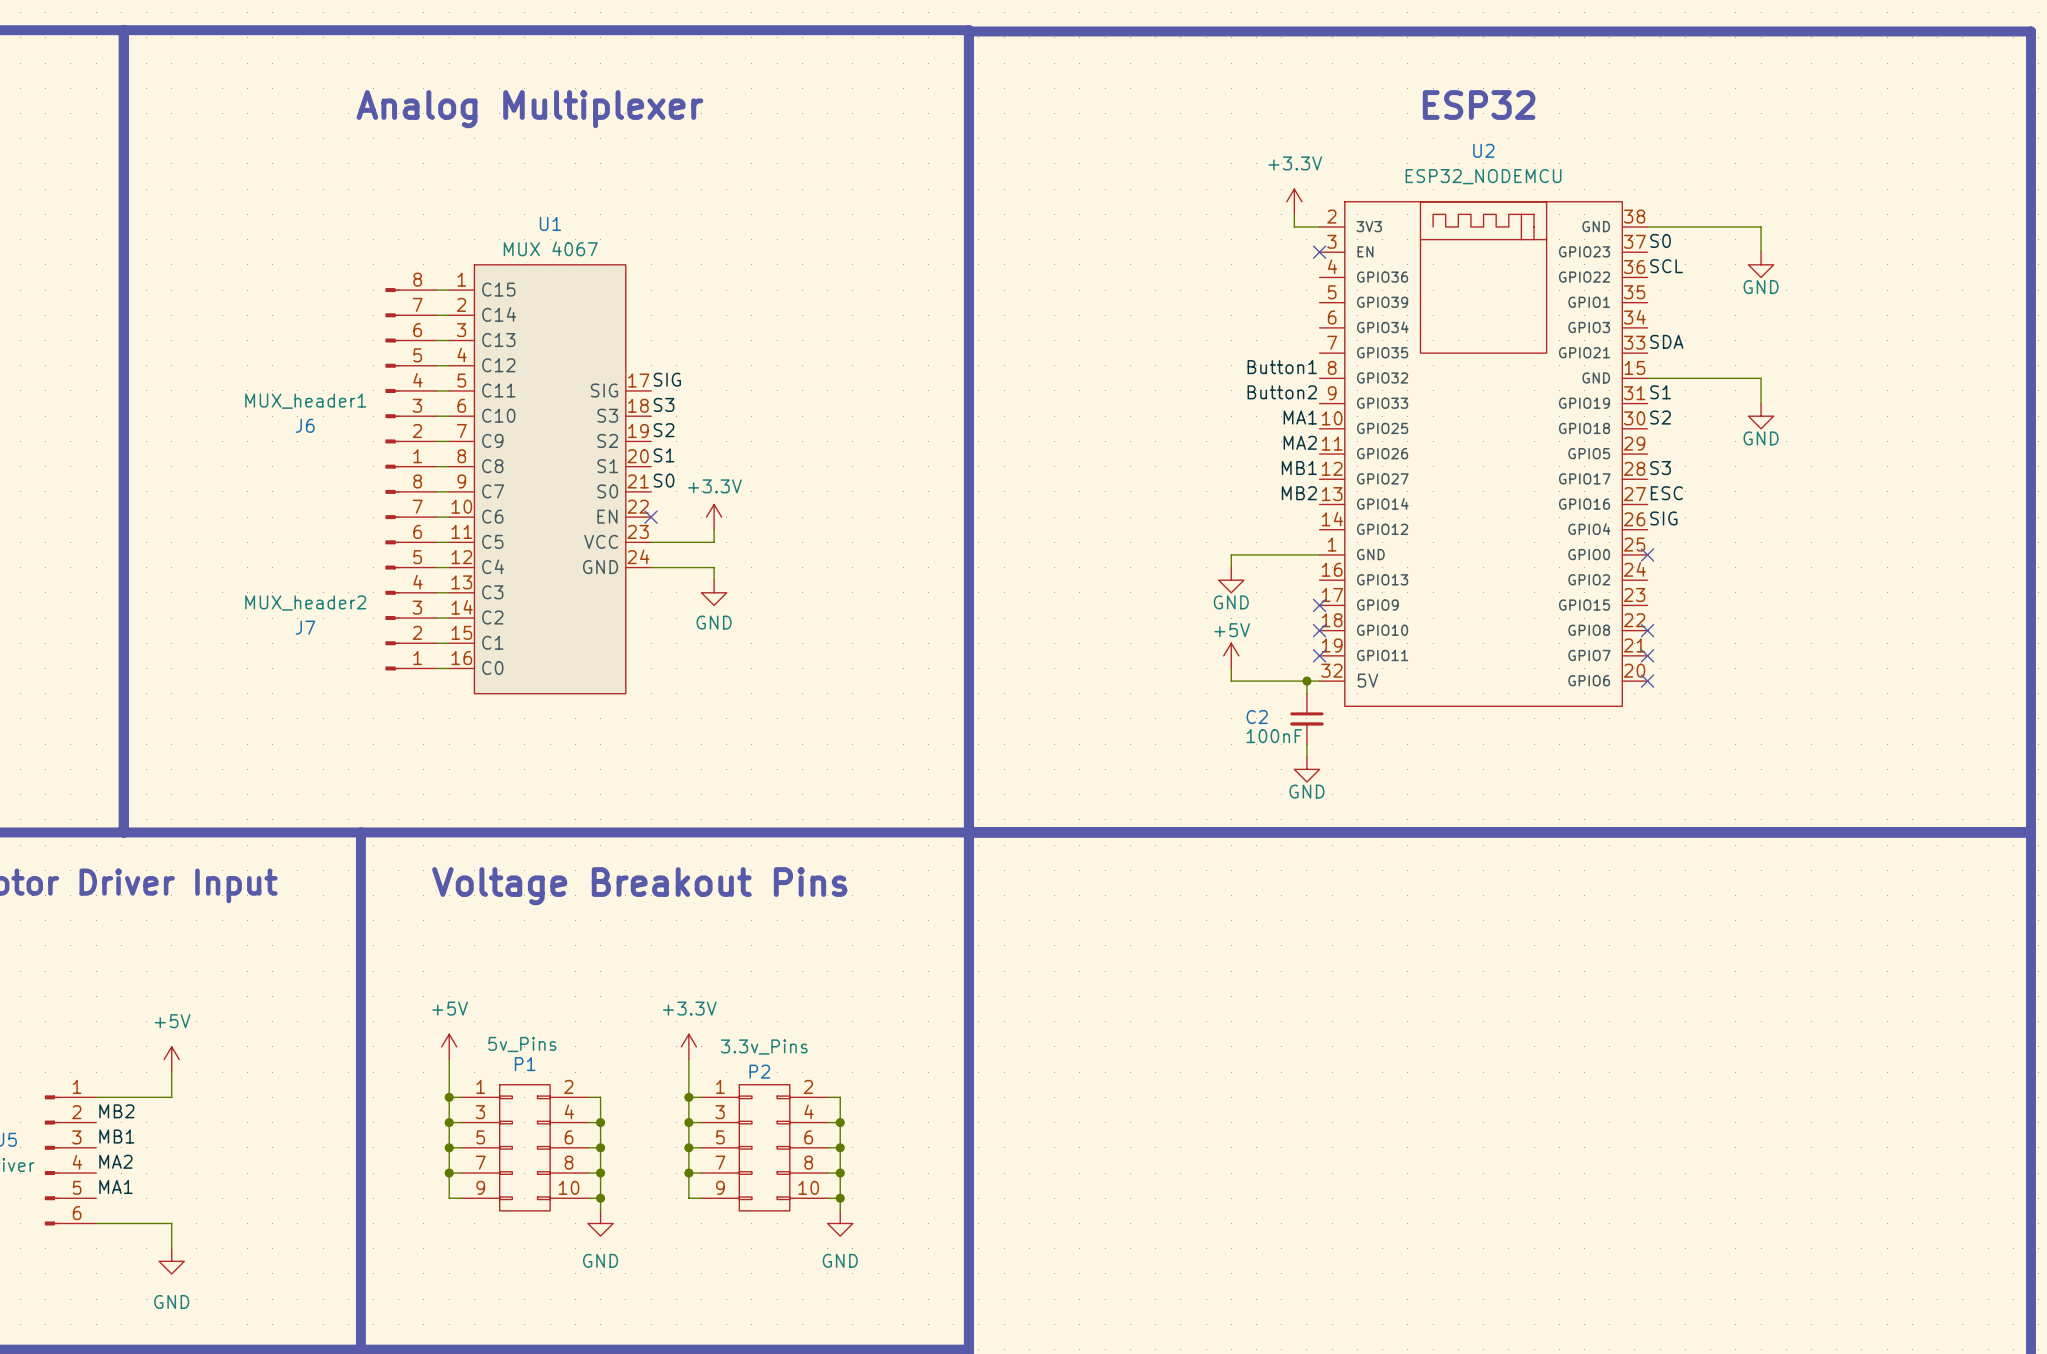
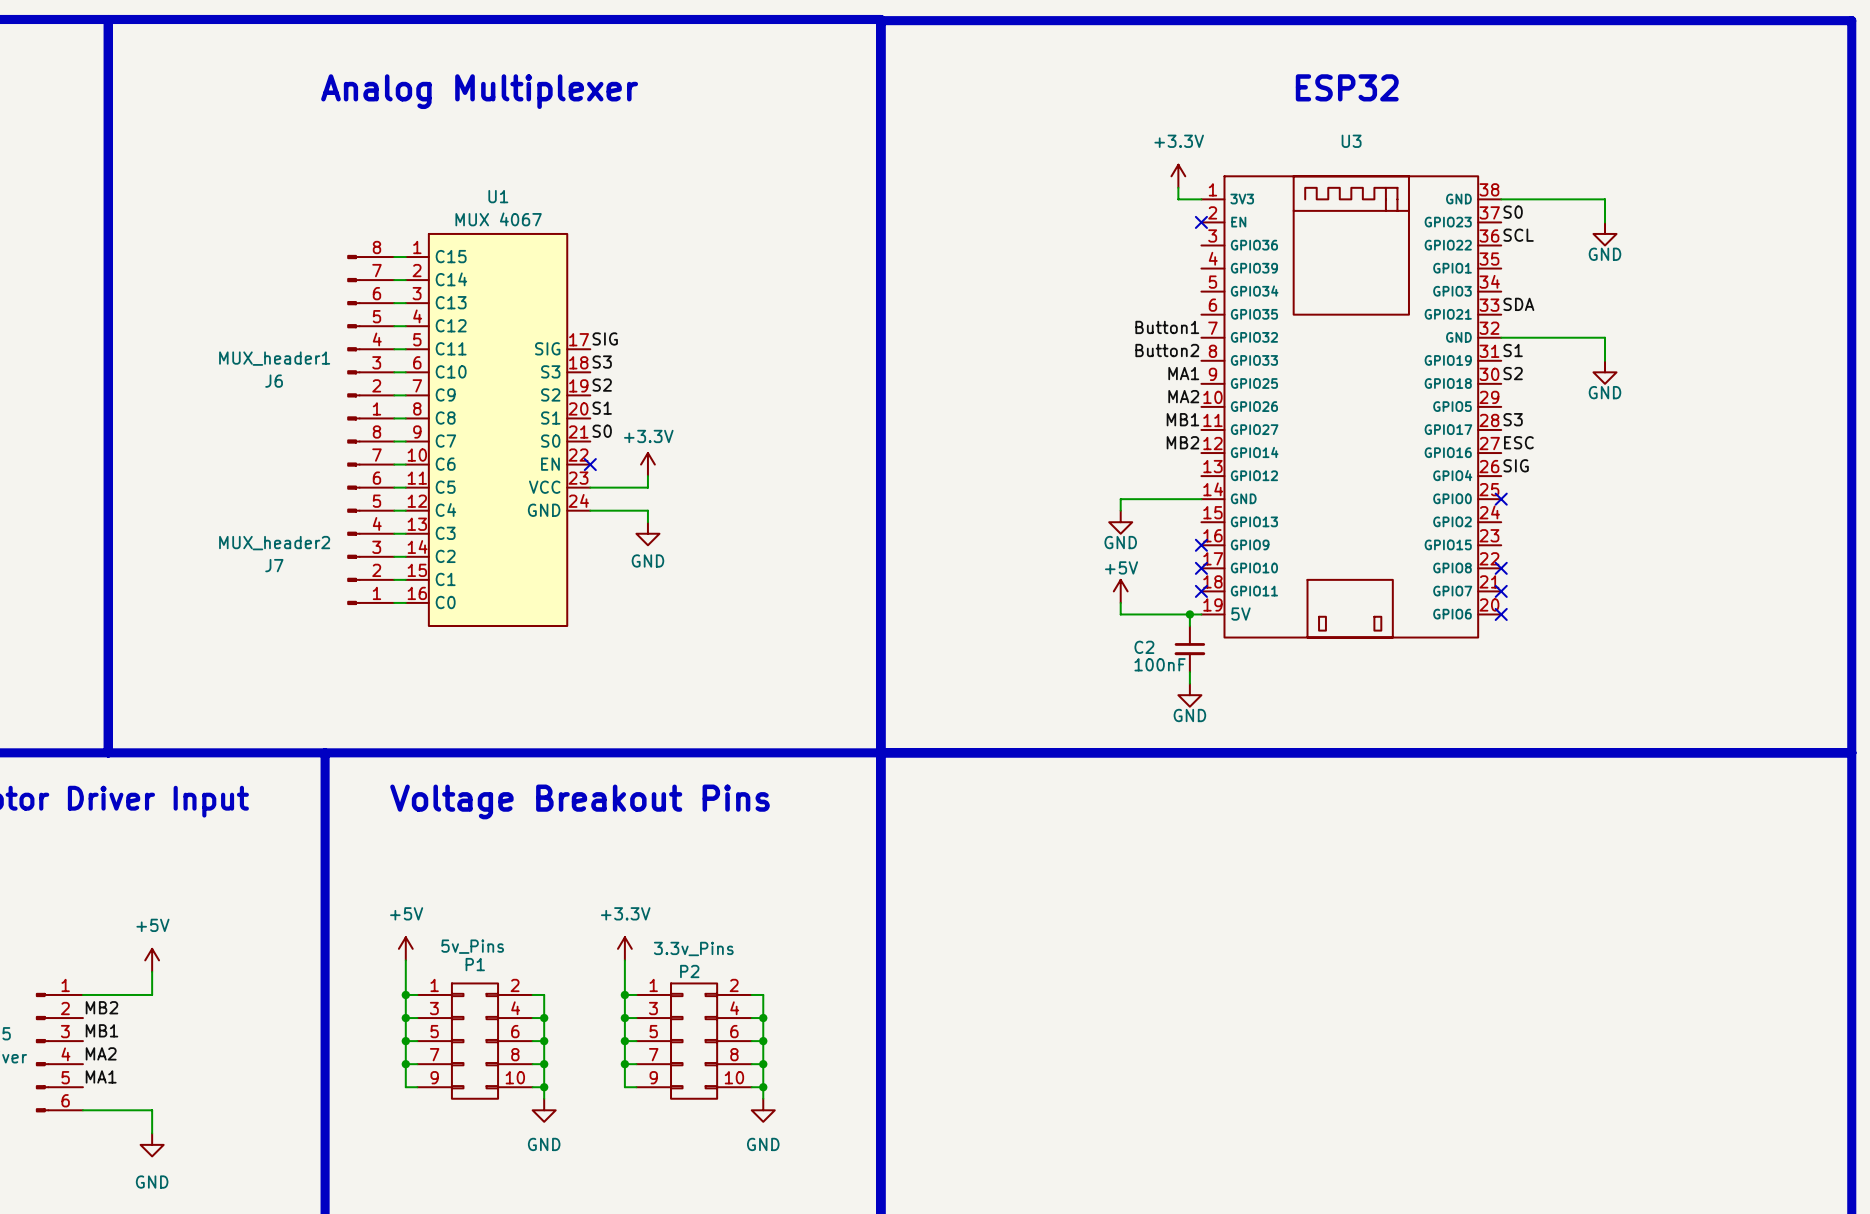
U2: ESP32_NODEMCU (1483, 454) -> none
U3: none -> (1351, 406)

